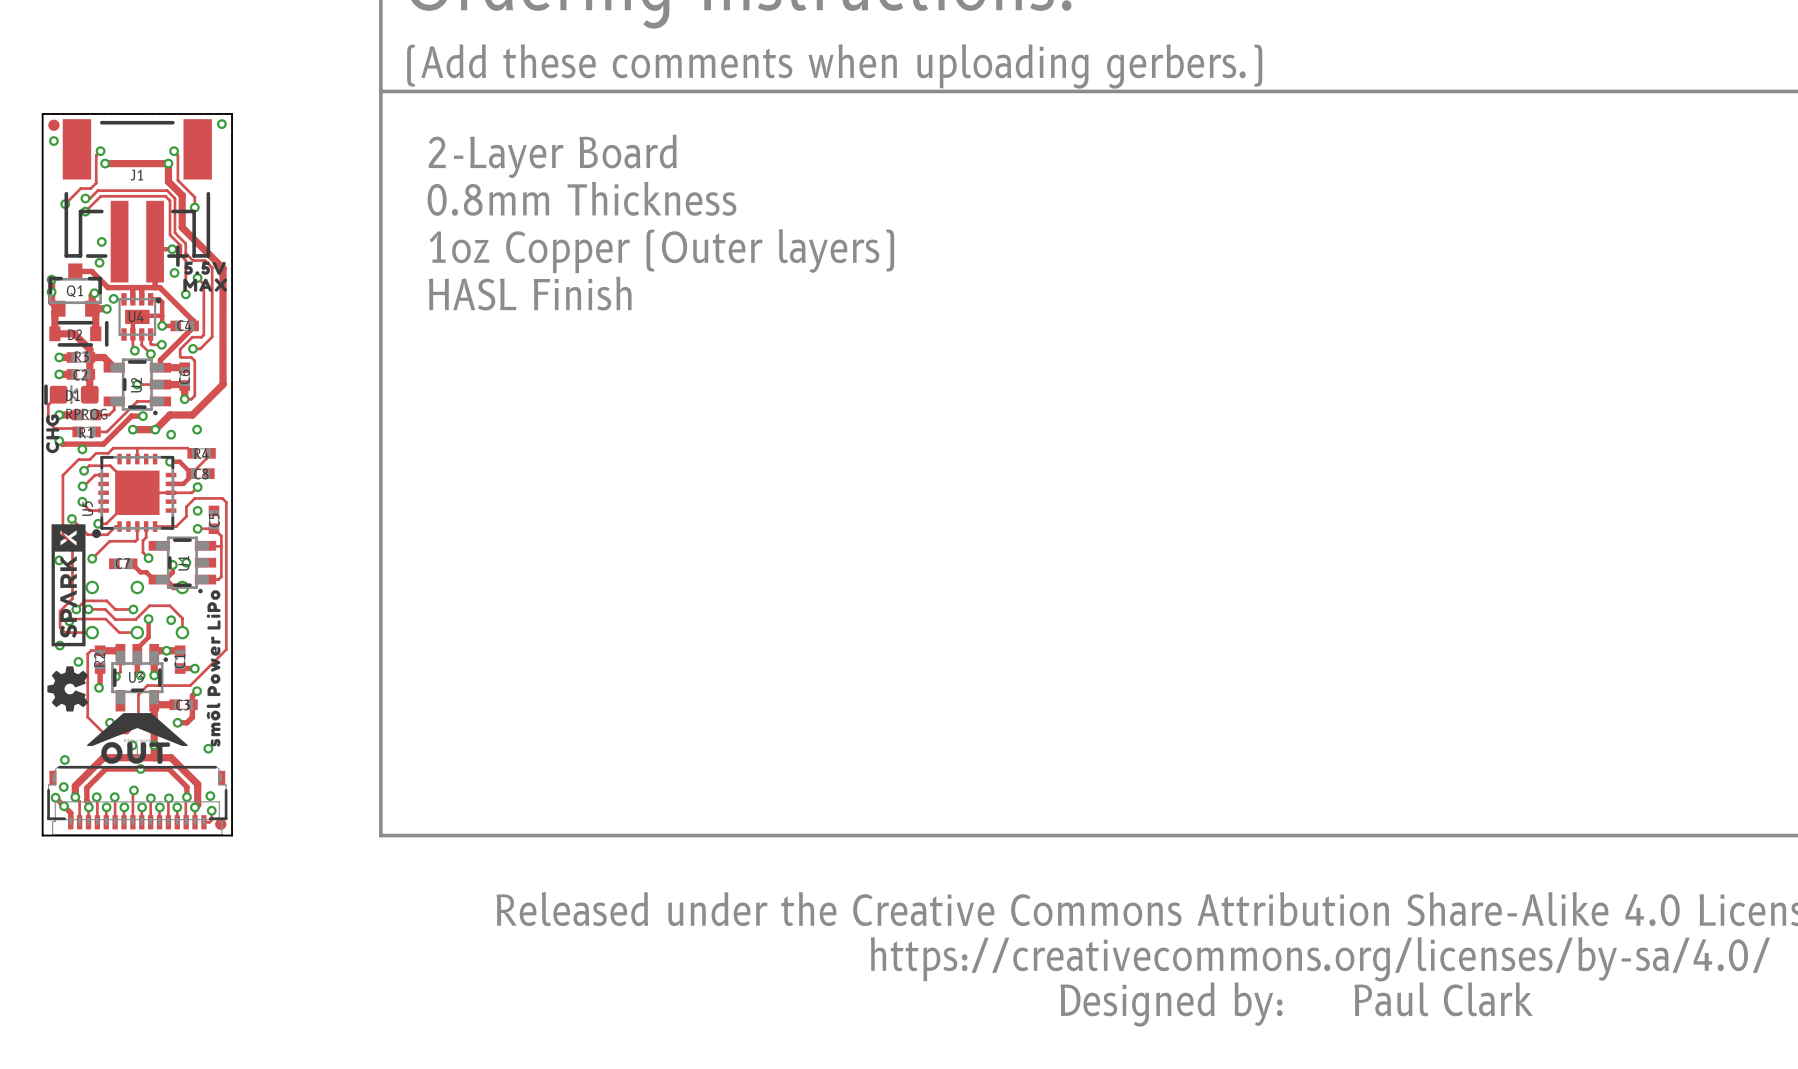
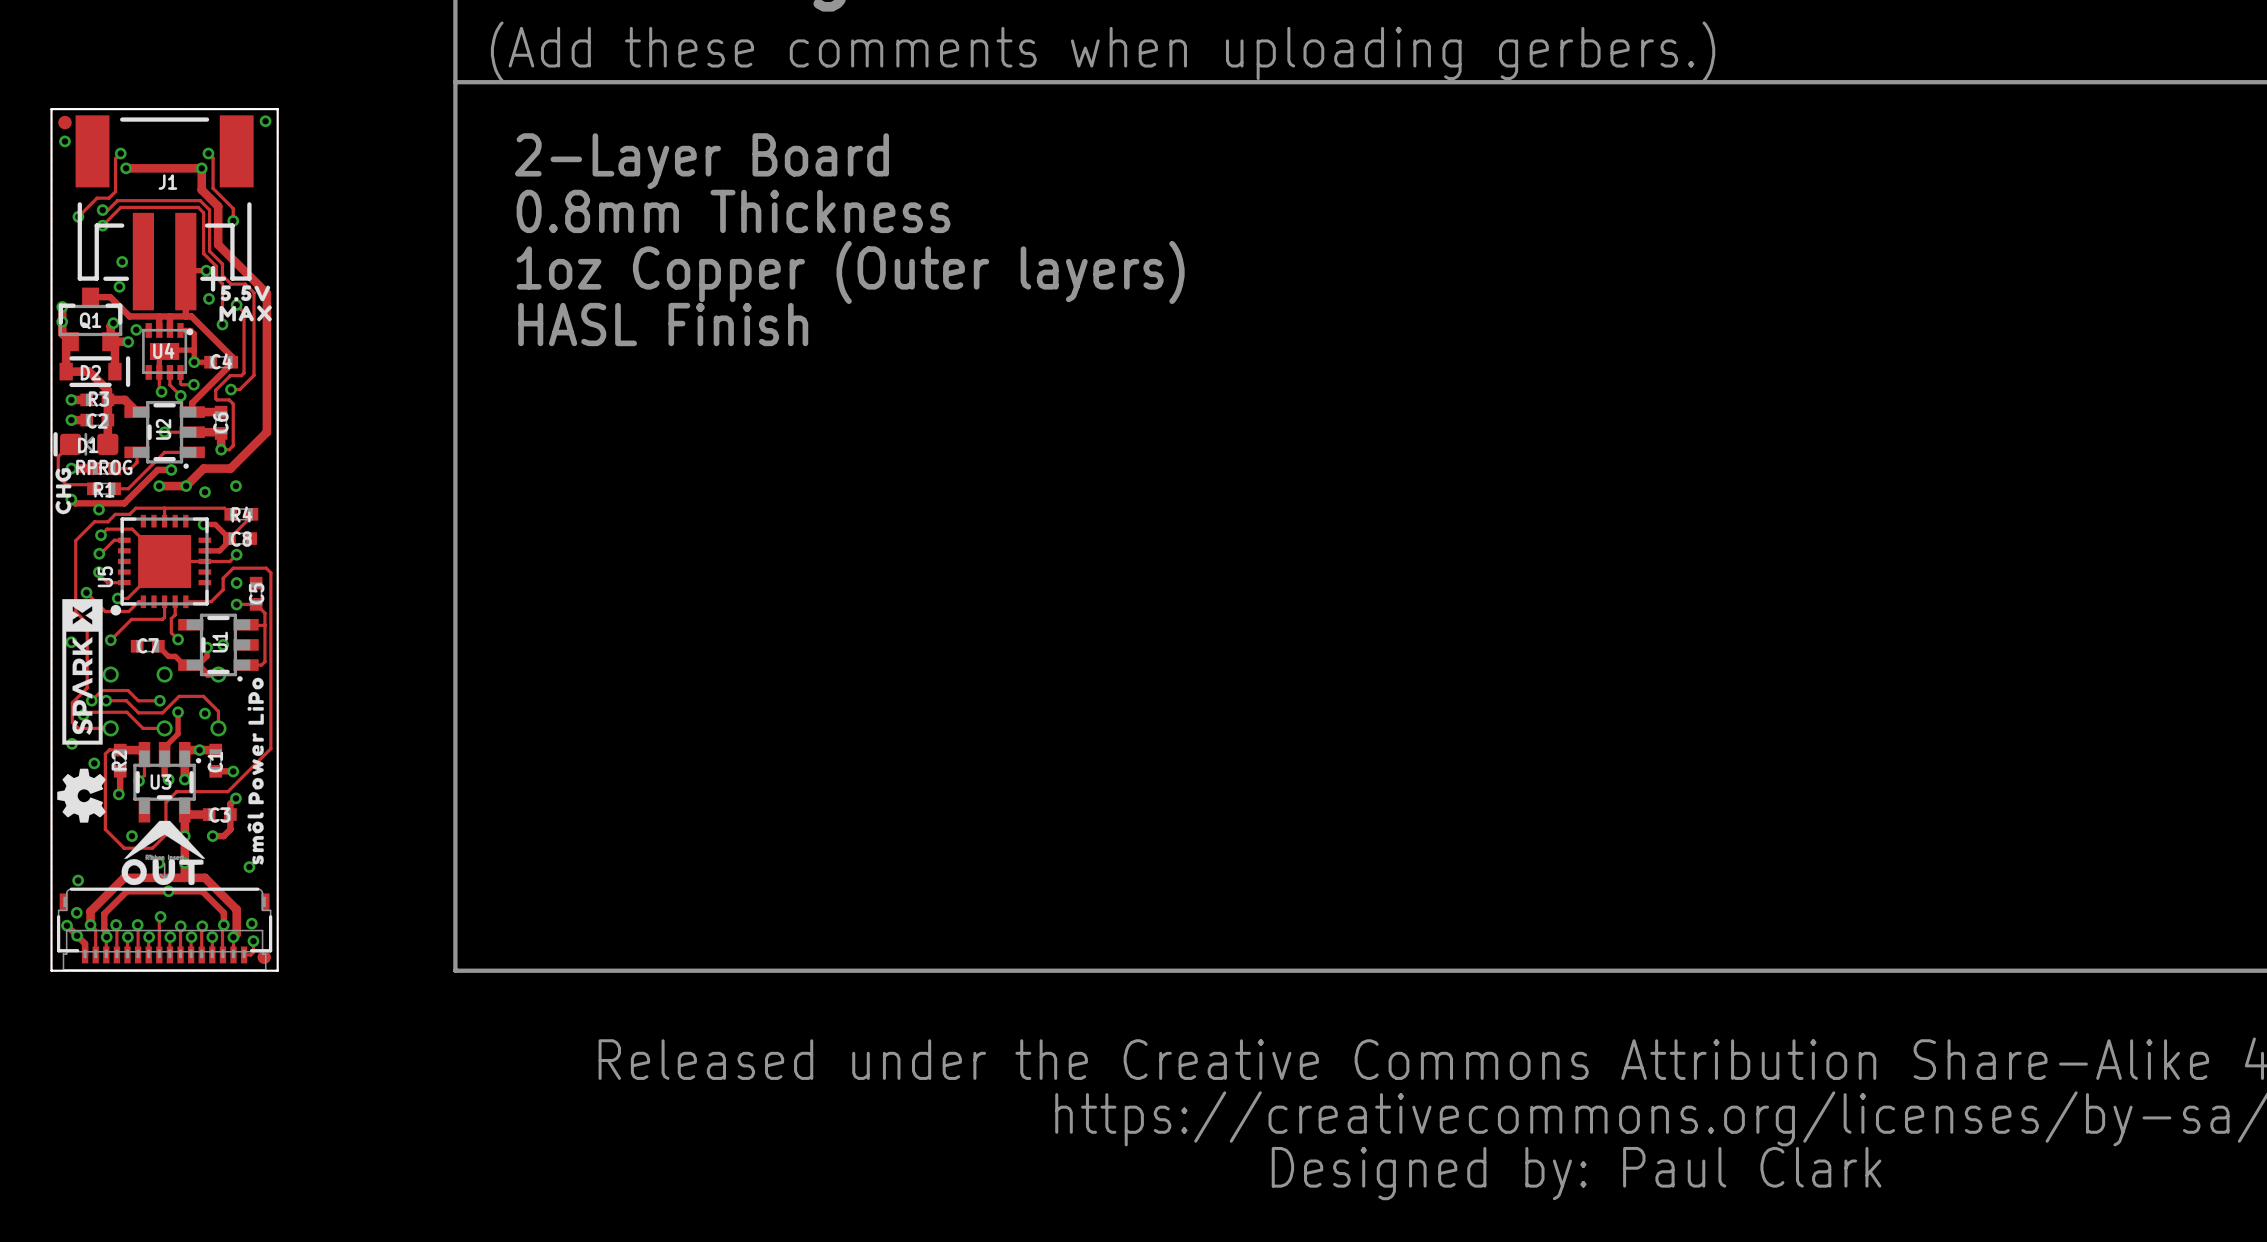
drawing shape: [87, 713, 188, 747] -> [124, 820, 206, 859]

